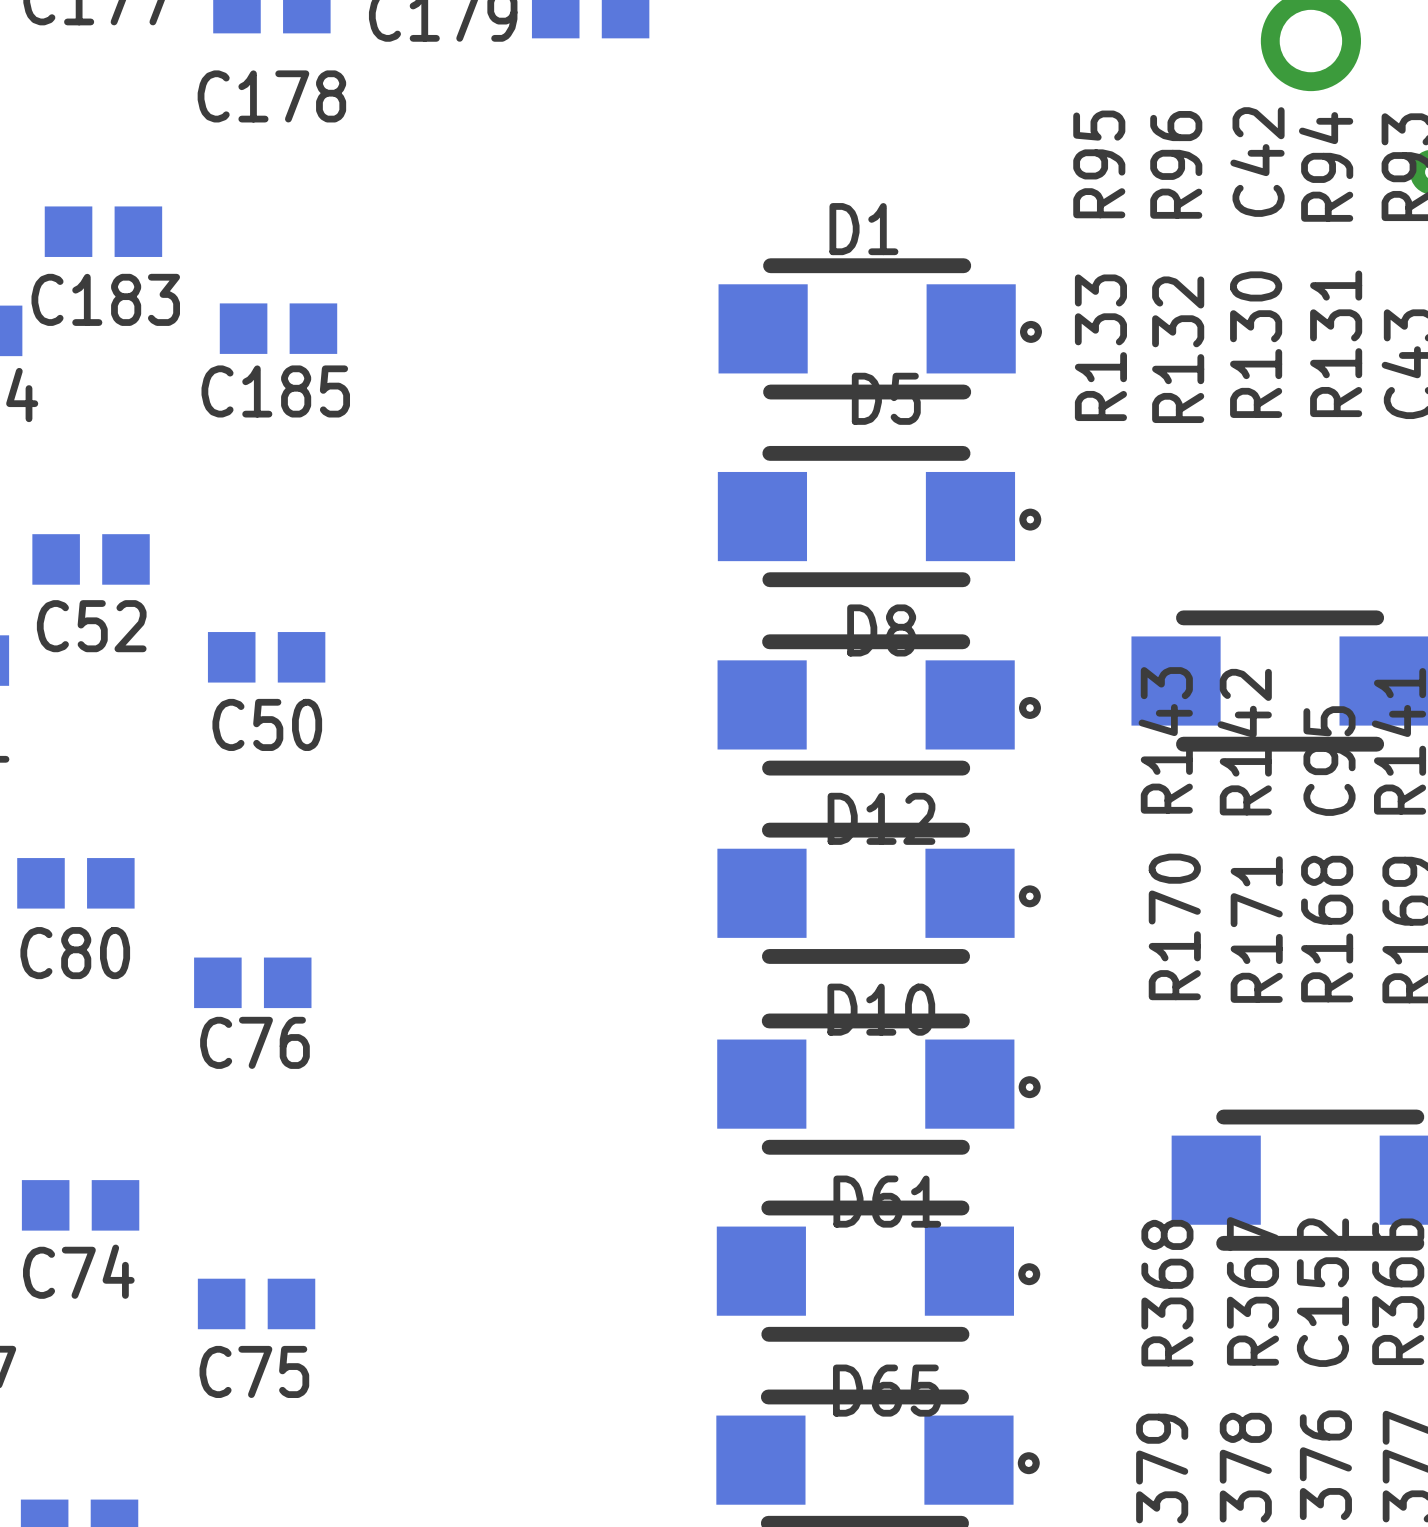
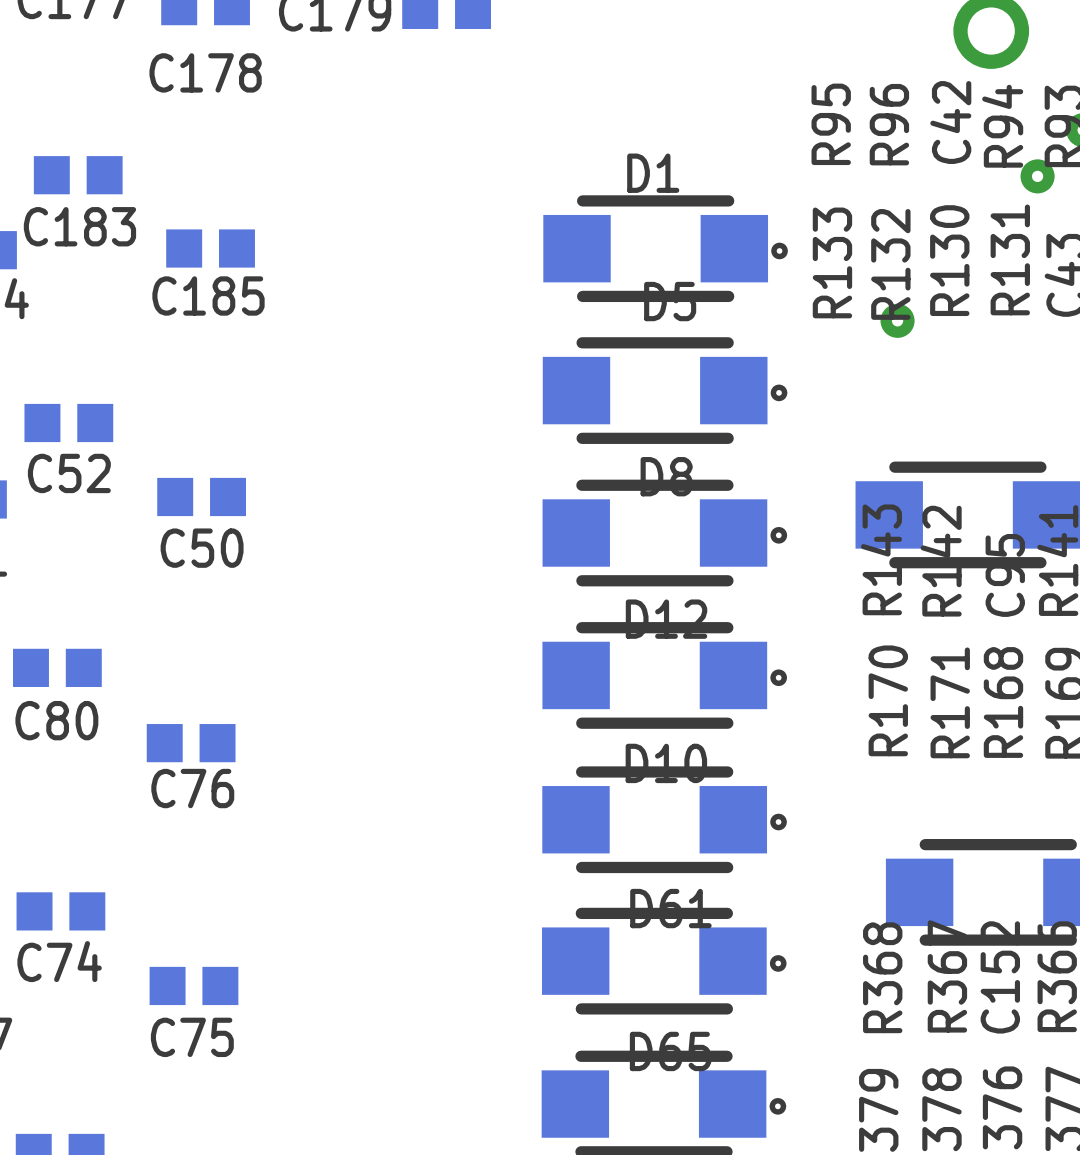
via: none -> (1037, 176)
via: none -> (897, 320)

